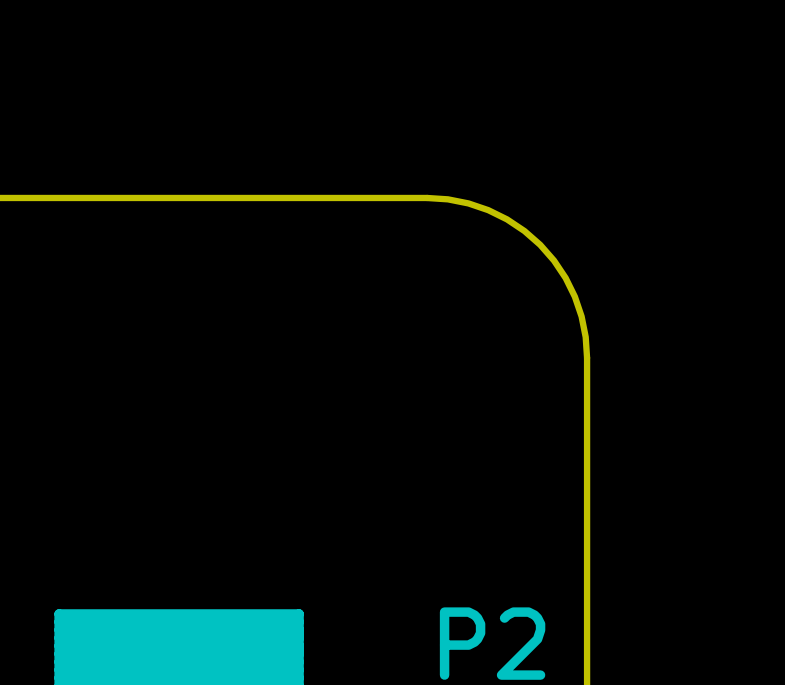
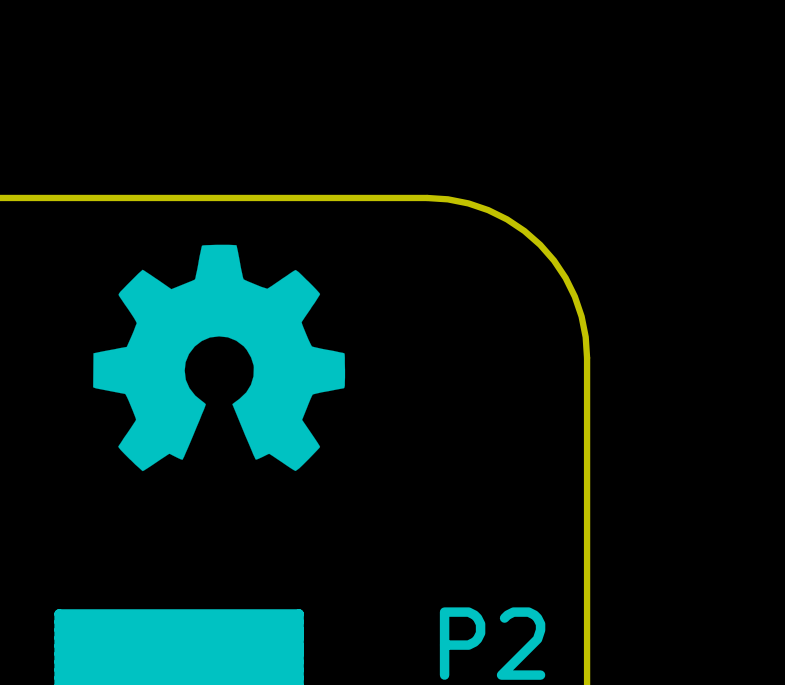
drawing: none -> [93, 244, 346, 472]

